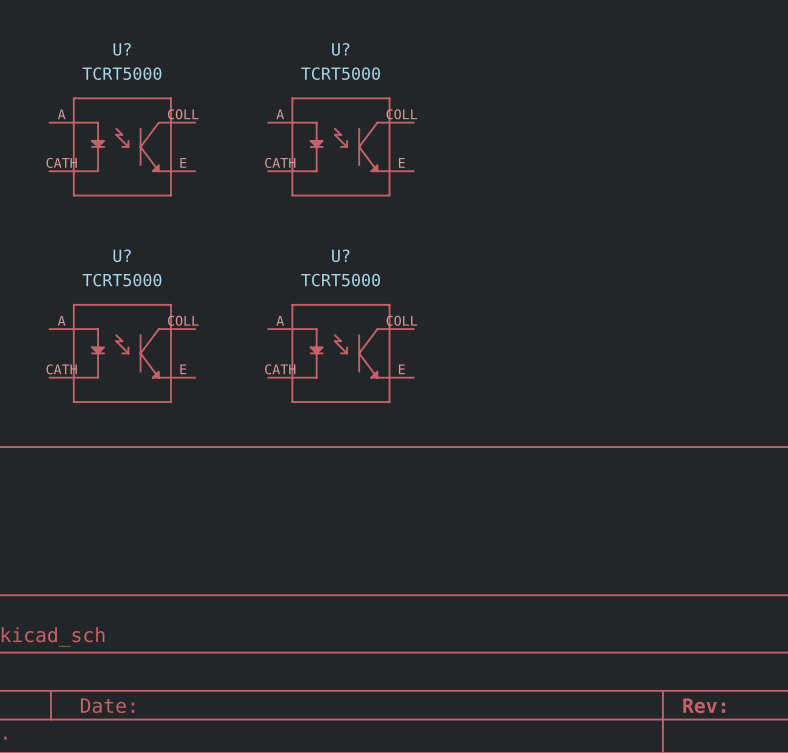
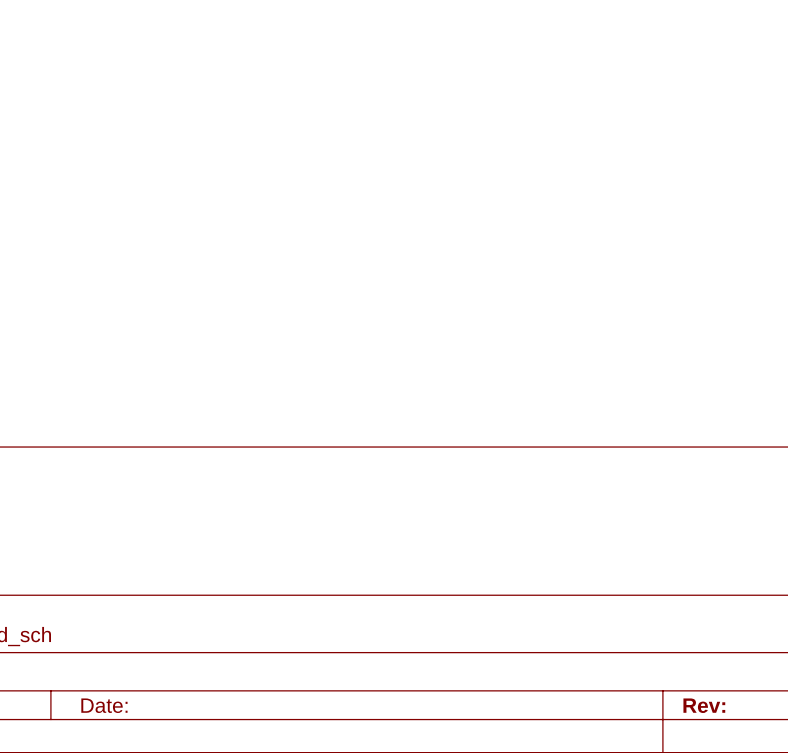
U?: TCRT5000 (122, 146) -> none
U?: TCRT5000 (340, 146) -> none
U?: TCRT5000 (122, 353) -> none
U?: TCRT5000 (340, 353) -> none

